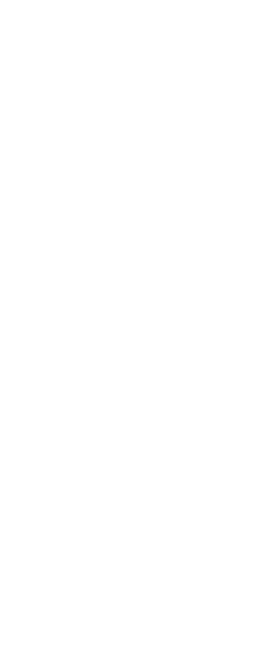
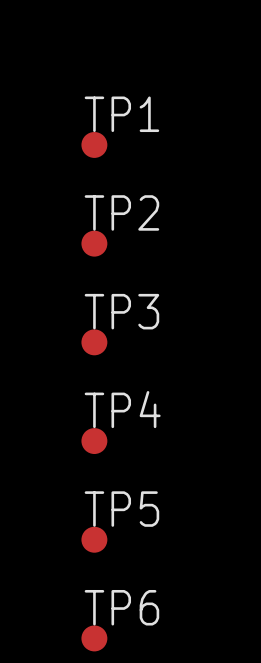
TP1: none -> (94, 144)
TP2: none -> (94, 243)
TP3: none -> (94, 342)
TP4: none -> (94, 441)
TP5: none -> (94, 539)
TP6: none -> (94, 638)

